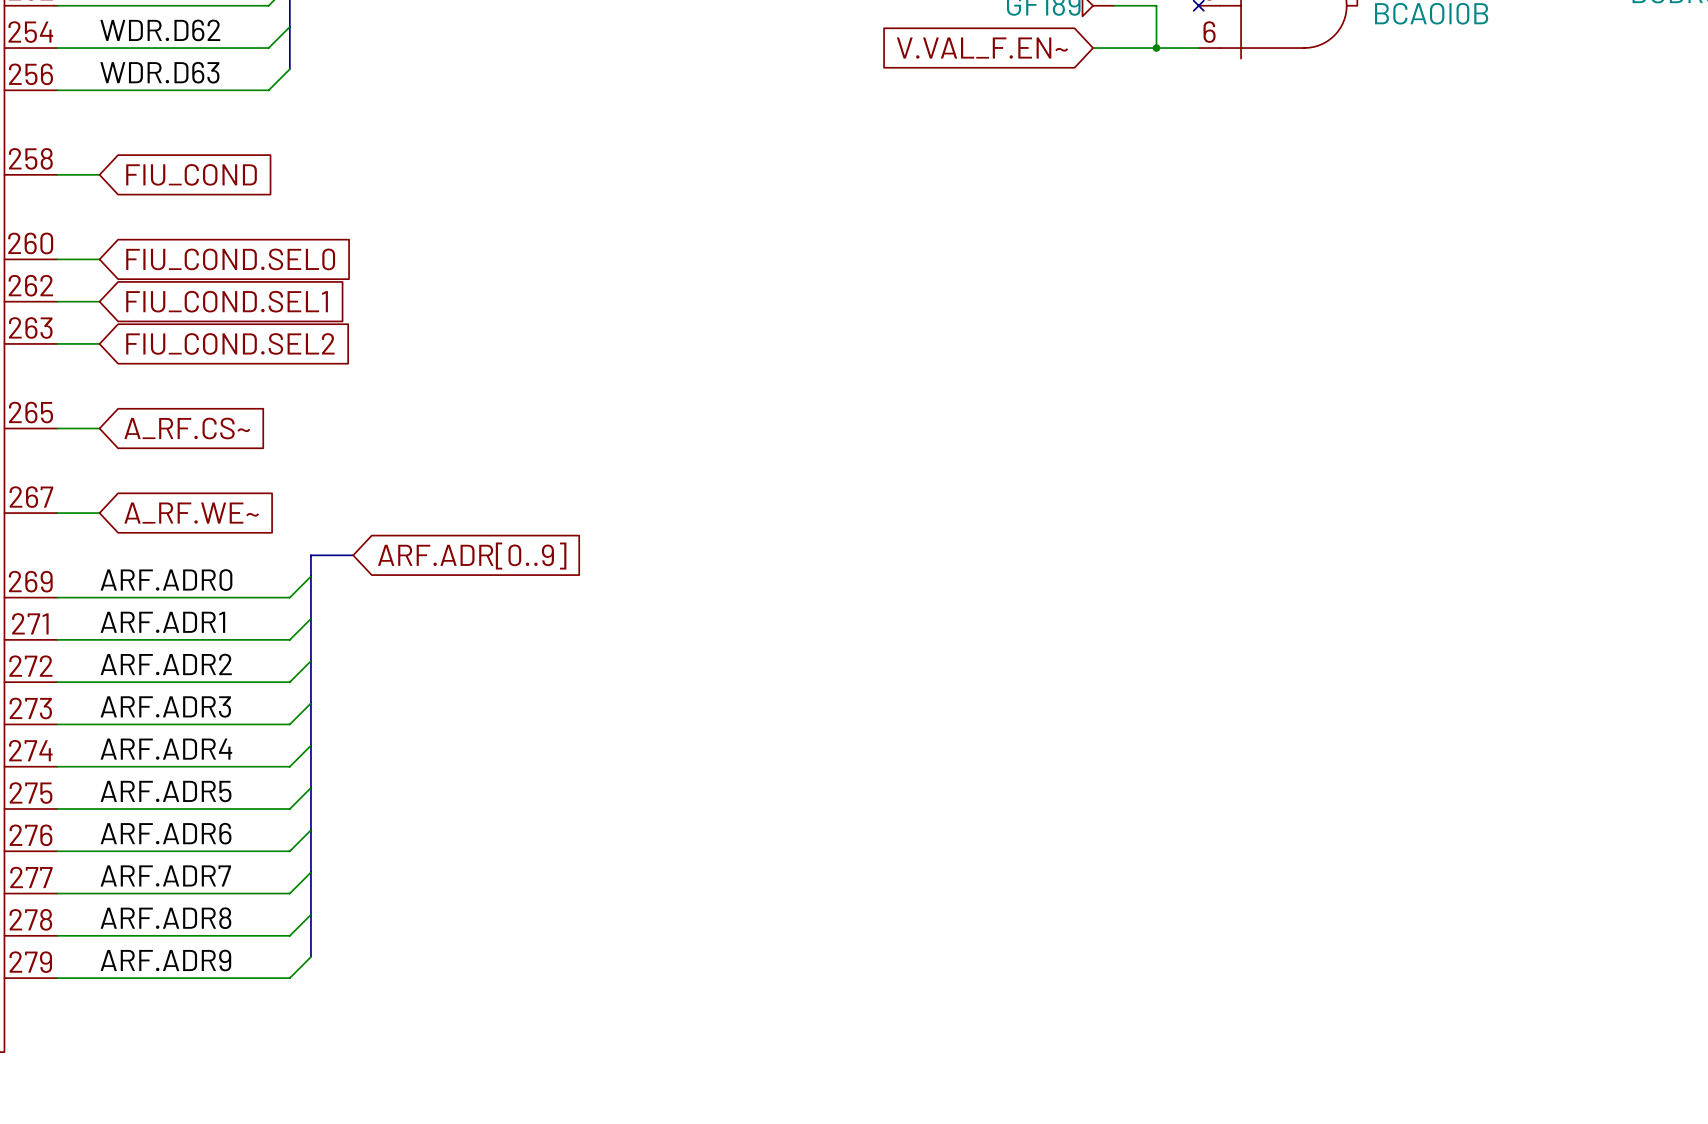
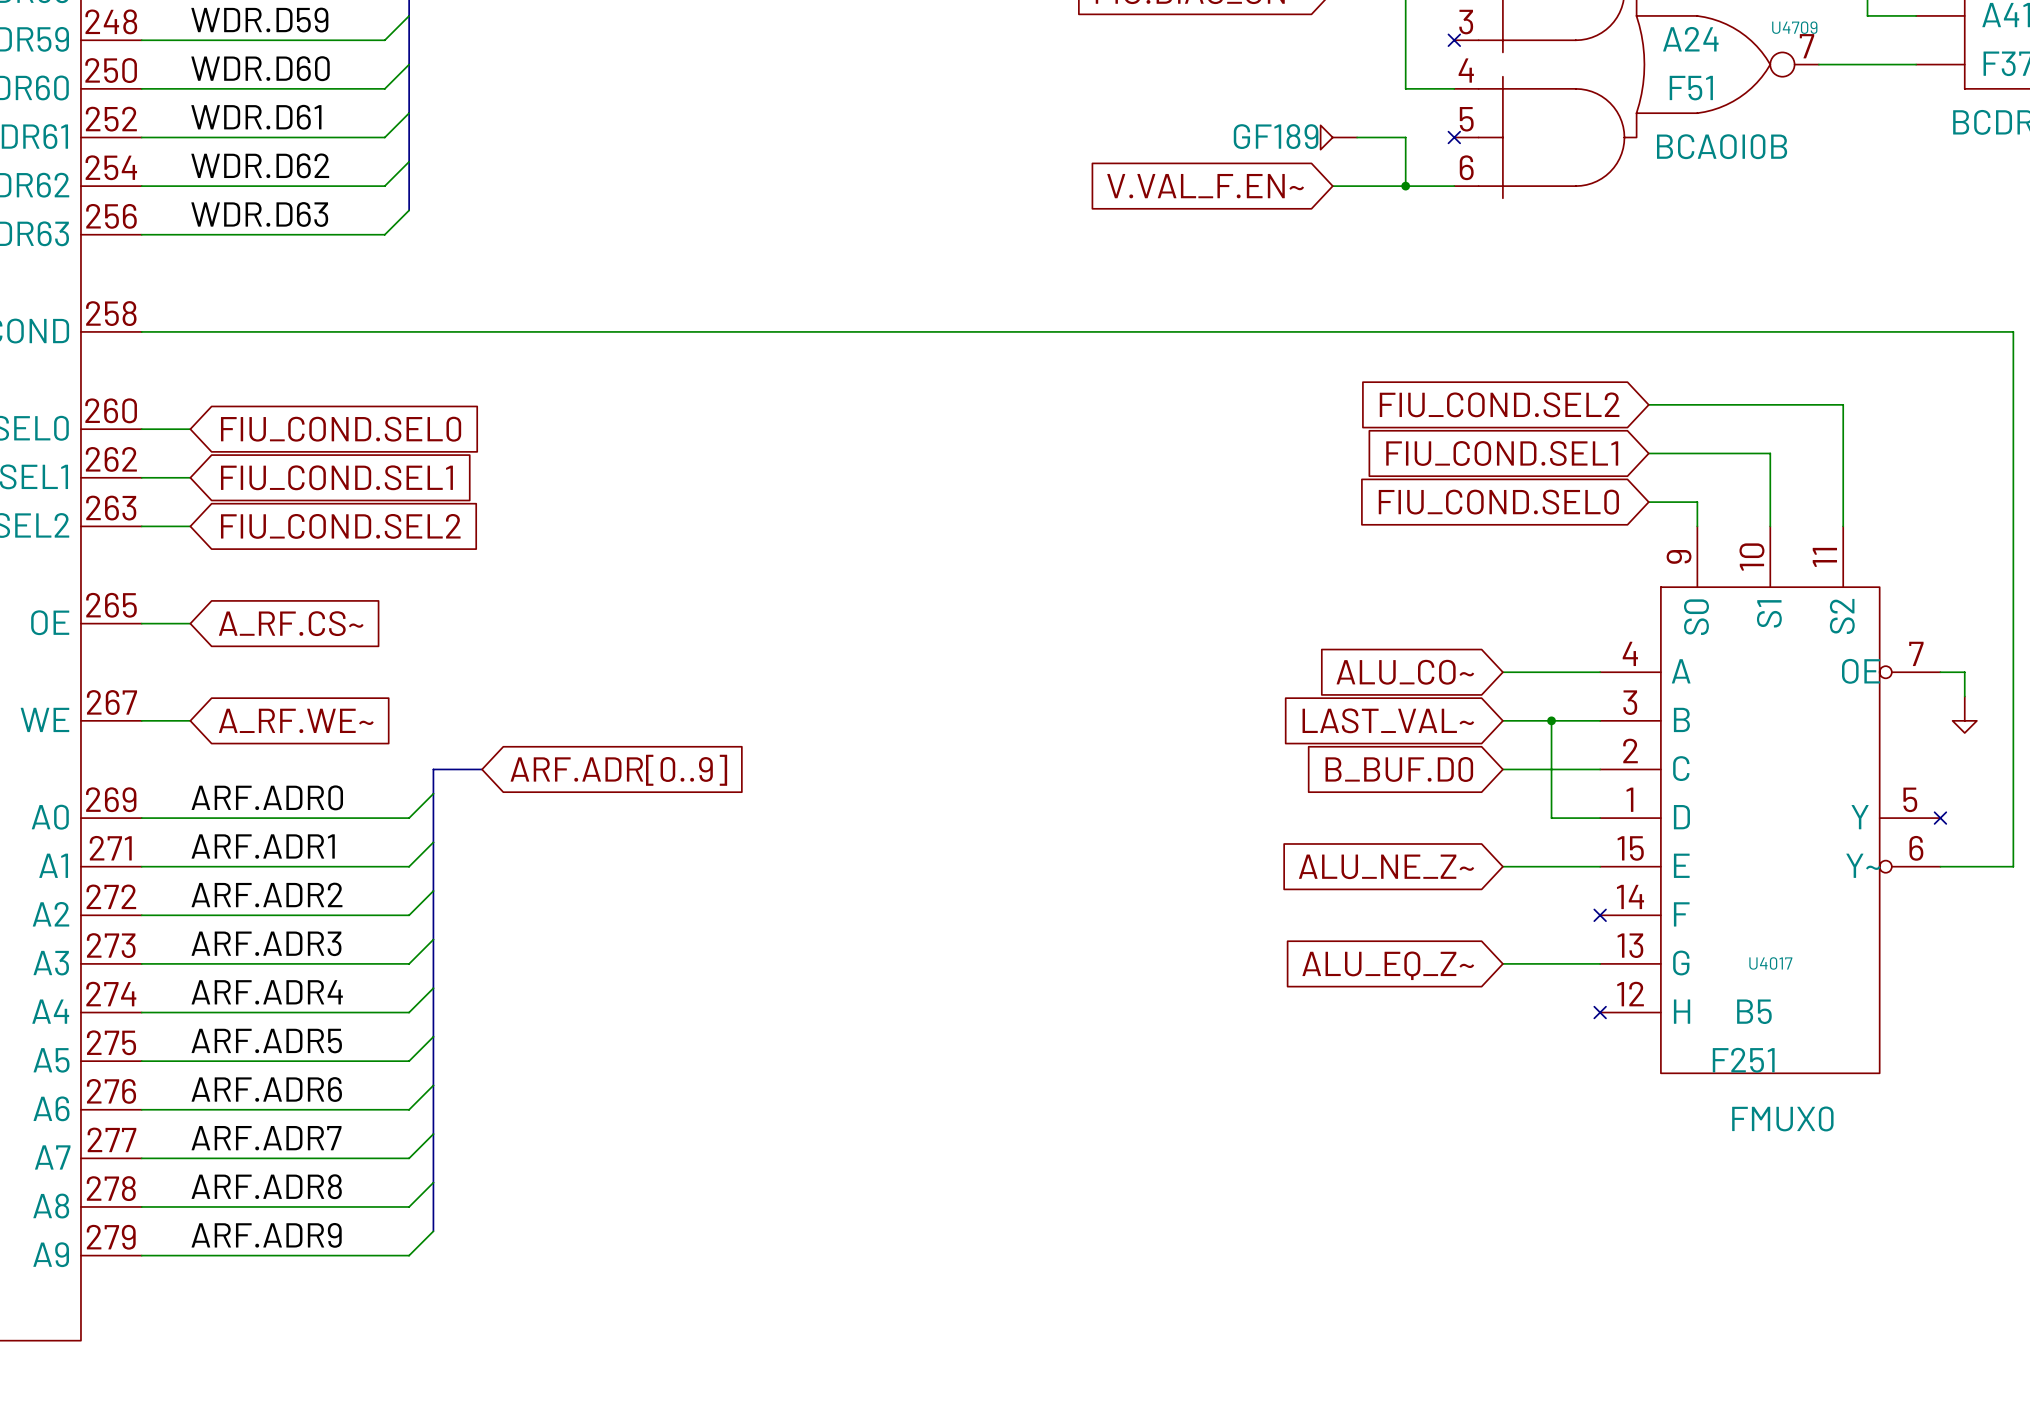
wire: none -> (190, 331) (2013, 331) (2013, 866) (1940, 866)
global label: FIU_COND (191, 174) -> none
global label: none -> FIU_COND.SEL2 (1499, 404)
wire: none -> (1648, 404) (1843, 404) (1843, 526)
global label: none -> FIU_COND.SEL1 (1502, 453)
wire: none -> (1648, 453) (1770, 453) (1770, 526)
global label: none -> FIU_COND.SEL0 (1498, 502)
wire: none -> (1648, 502) (1697, 502) (1697, 526)
global label: none -> ALU_CO~ (1405, 672)
wire: none -> (1502, 672) (1600, 672)
wire: none -> (1940, 672) (1964, 672) (1964, 696)
power symbol: none -> (1964, 715)
global label: none -> LAST_VAL~ (1388, 720)
wire: none -> (1502, 720) (1600, 720)
wire: none -> (1551, 720) (1551, 818) (1600, 818)
junction: none -> (1551, 720)
global label: none -> B_BUF.D0 (1399, 769)
wire: none -> (1502, 769) (1600, 769)
U4017: none -> F251 (1770, 799)
no-connect mark: none -> (1940, 818)
wire: none -> (1502, 866) (1600, 866)
global label: none -> ALU_NE_Z~ (1386, 866)
no-connect mark: none -> (1600, 915)
wire: none -> (1502, 963) (1600, 963)
global label: none -> ALU_EQ_Z~ (1388, 965)
no-connect mark: none -> (1600, 1012)

